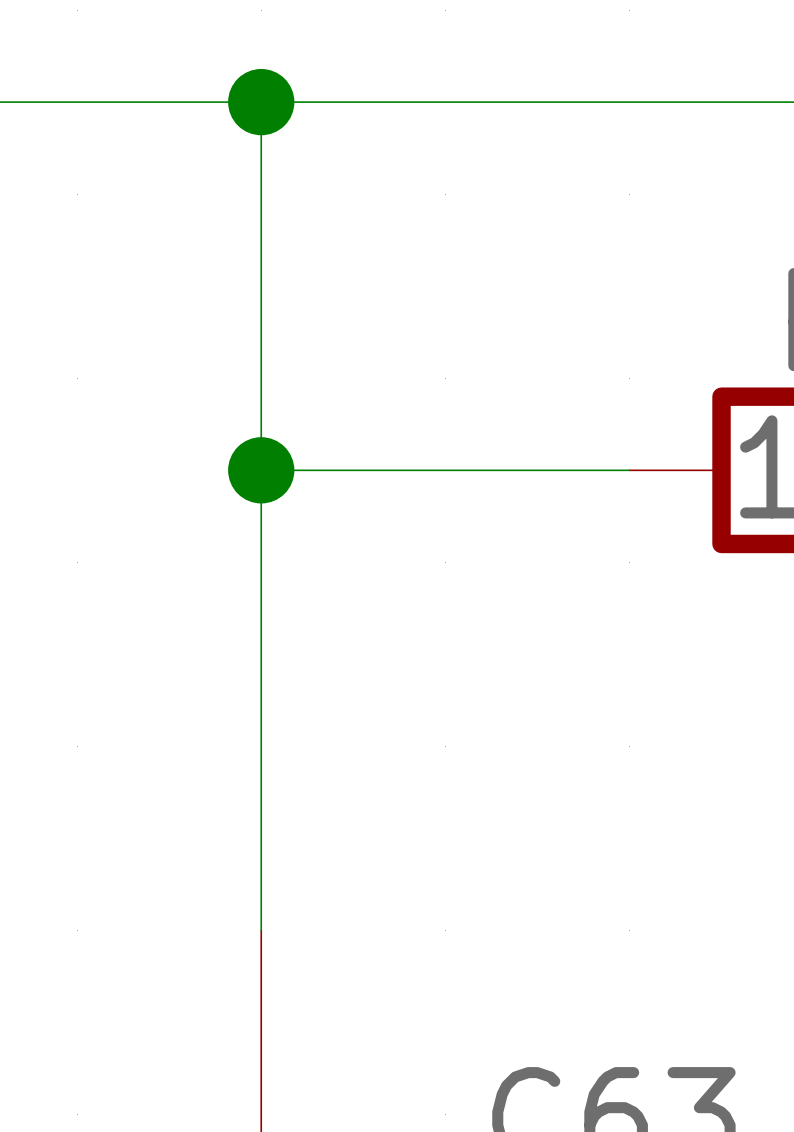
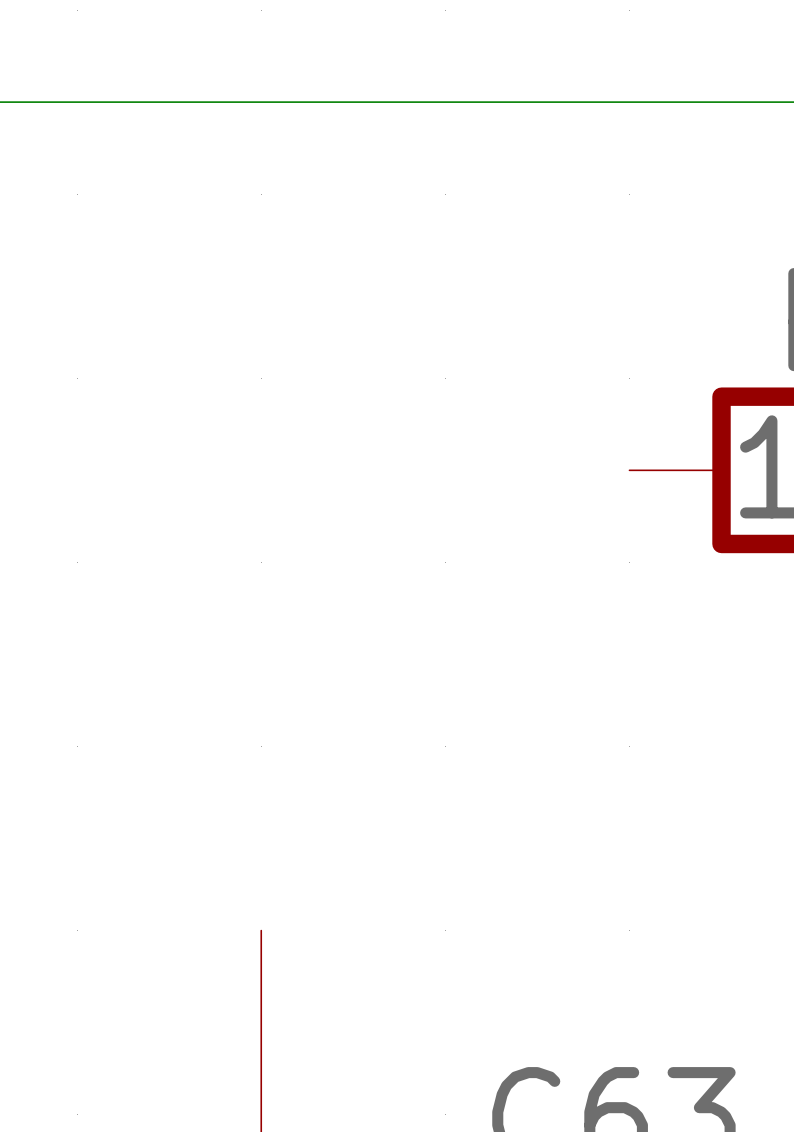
wire: (261, 102) (261, 930) -> none
junction: (261, 102) -> none
wire: (261, 470) (629, 470) -> none
junction: (261, 470) -> none

